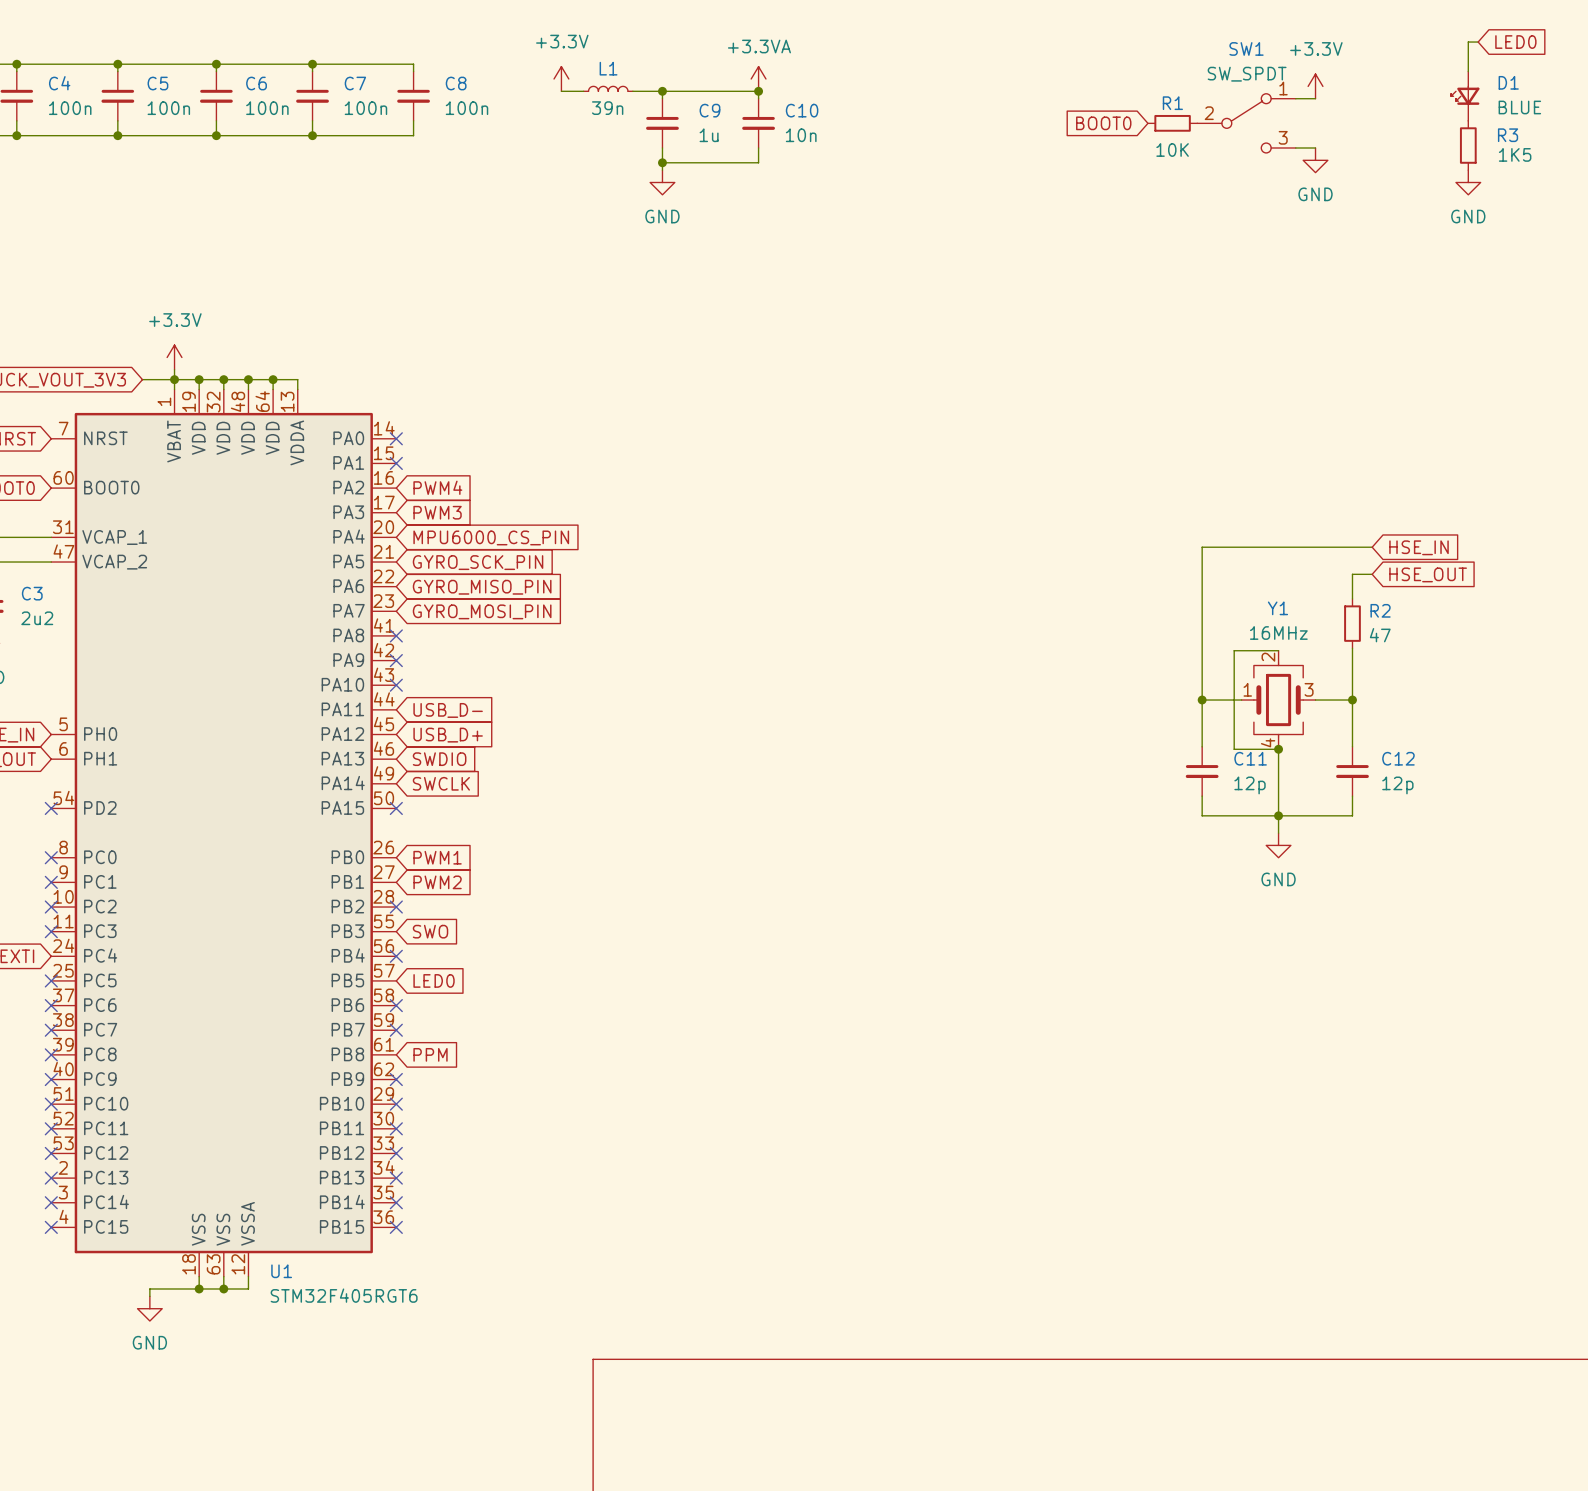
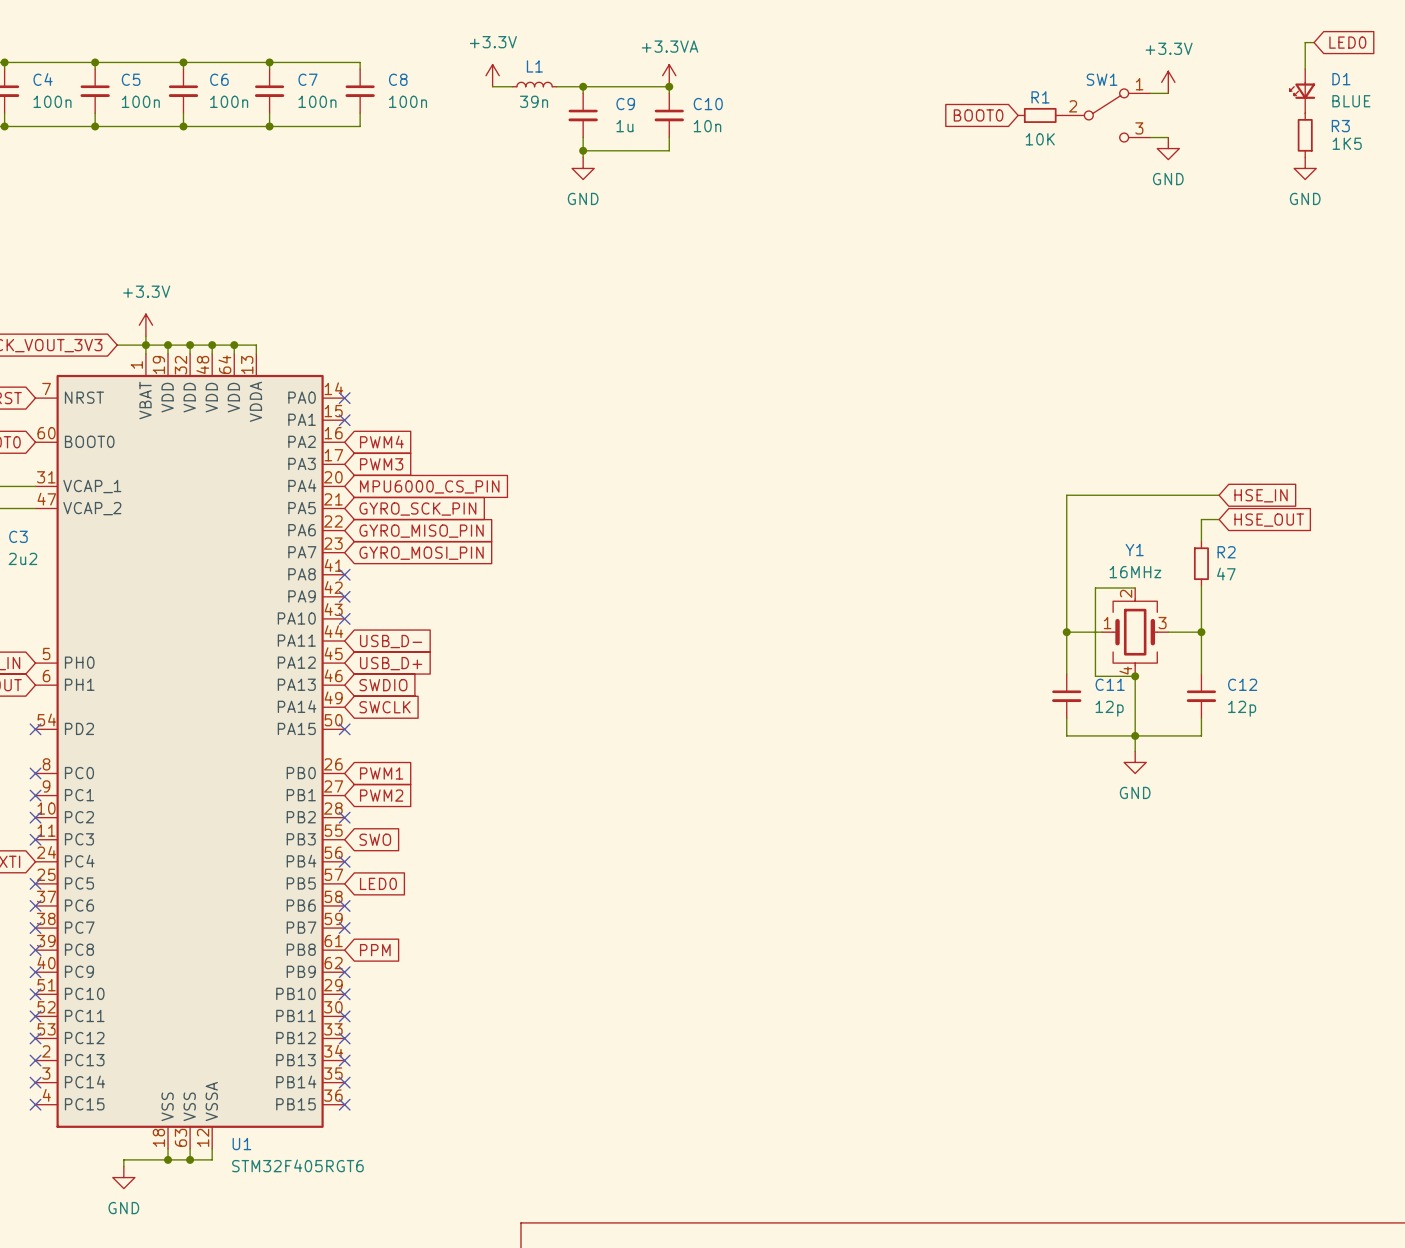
SW1 name position: SW1 (1246, 48) -> SW1 (1102, 79)
SW1 value: SW_SPDT (1247, 74) -> none

